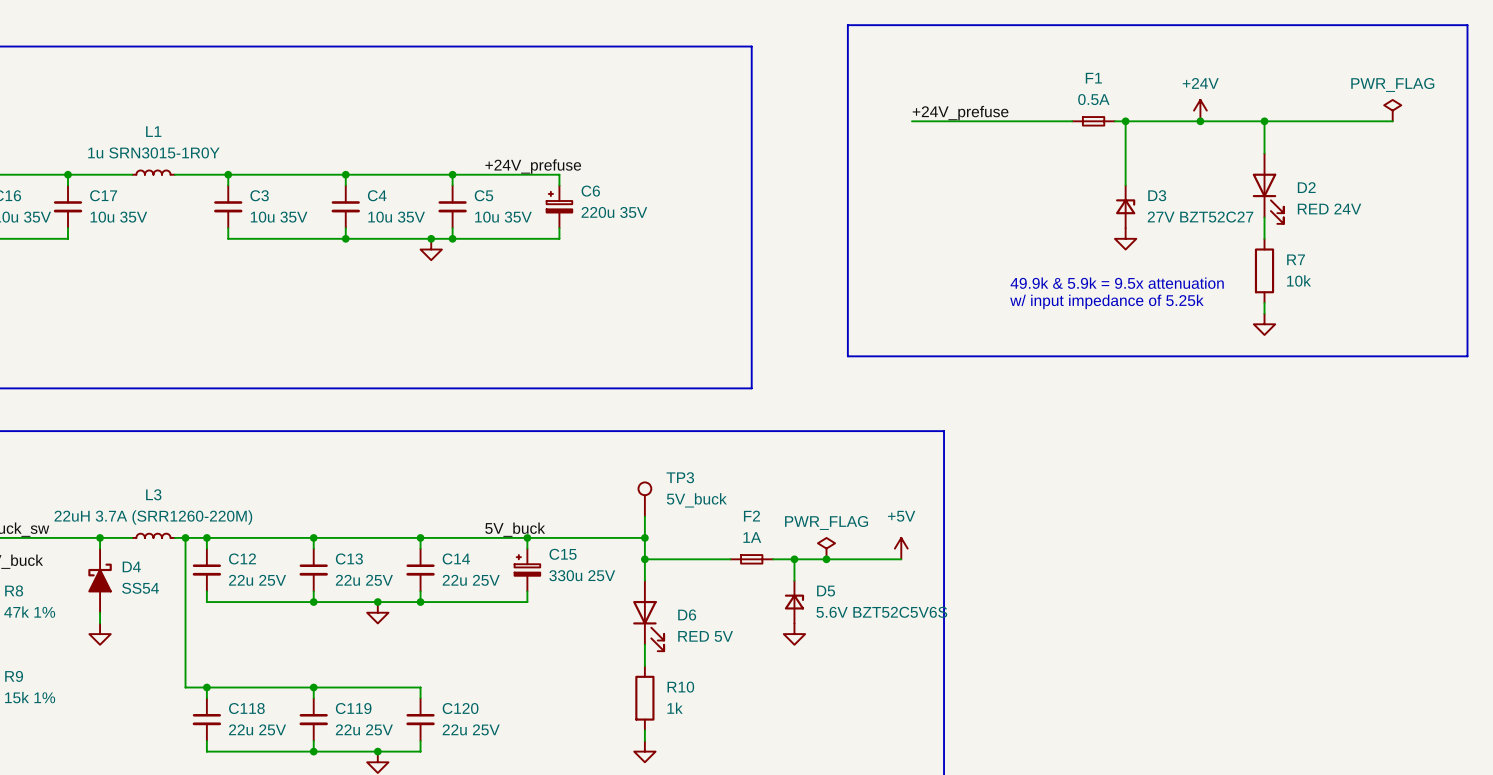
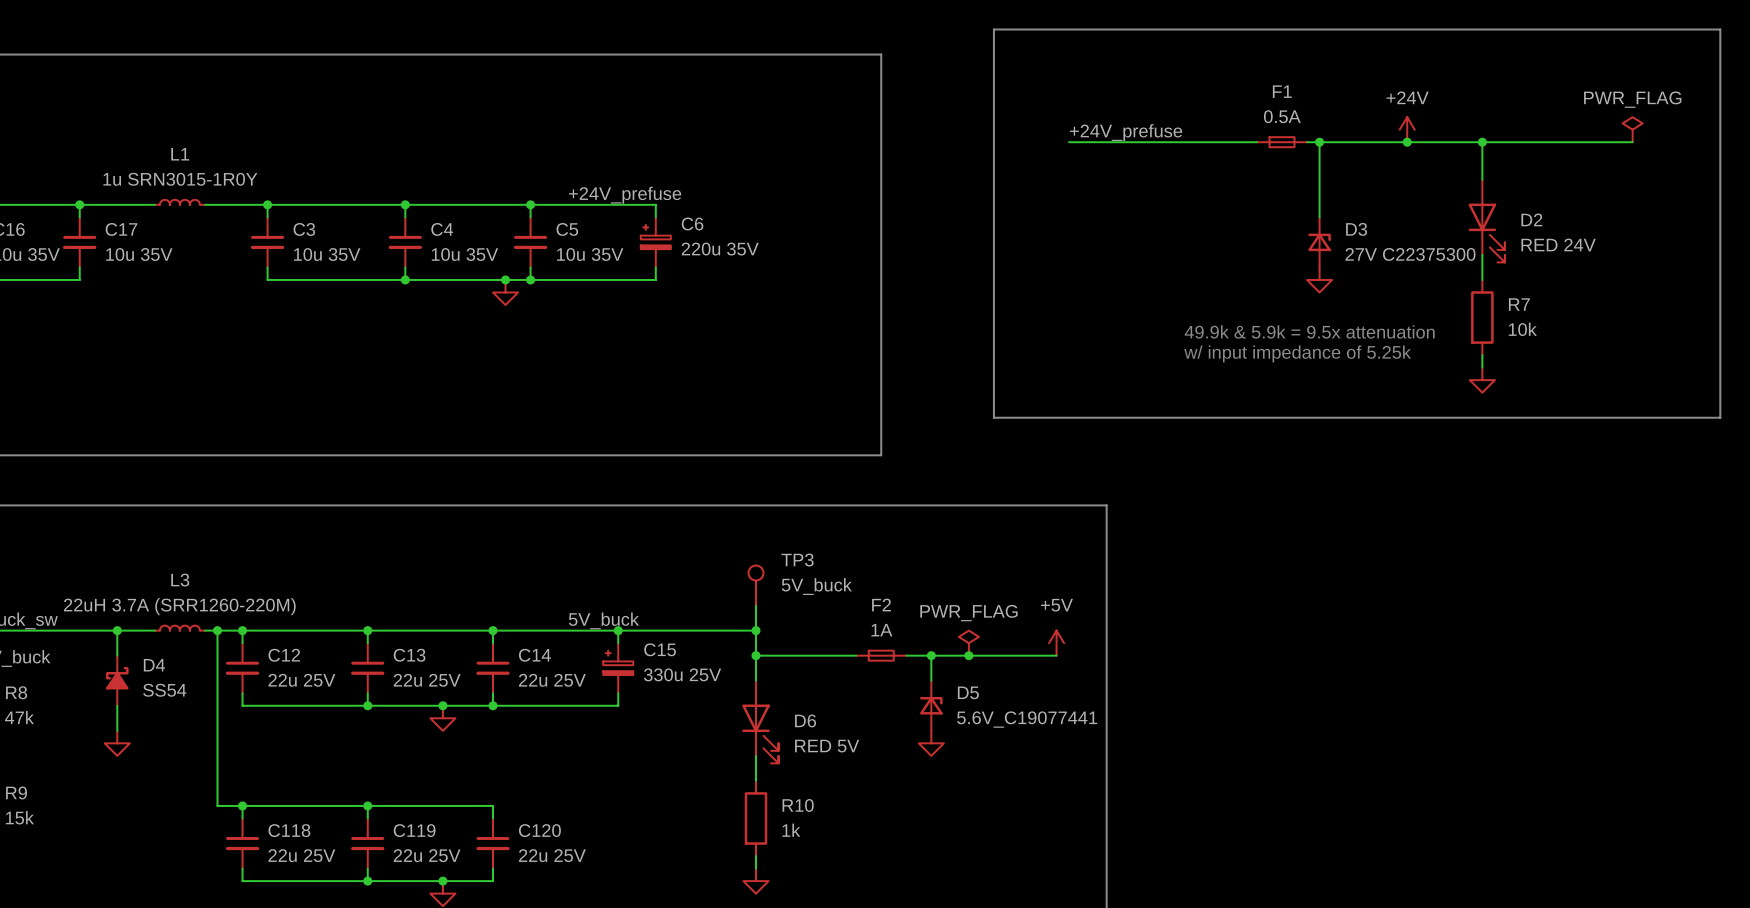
D3 value: 27V BZT52C27 (1200, 217) -> 27V C22375300 (1410, 254)
D4 symbol: [88, 548, 112, 613] -> [106, 655, 129, 706]
R8 value: 47k 1% (29, 612) -> 47k (19, 717)
D5 value: 5.6V BZT52C5V6S (881, 612) -> 5.6V_C19077441 (1027, 719)
R9 value: 15k 1% (30, 697) -> 15k (19, 817)

